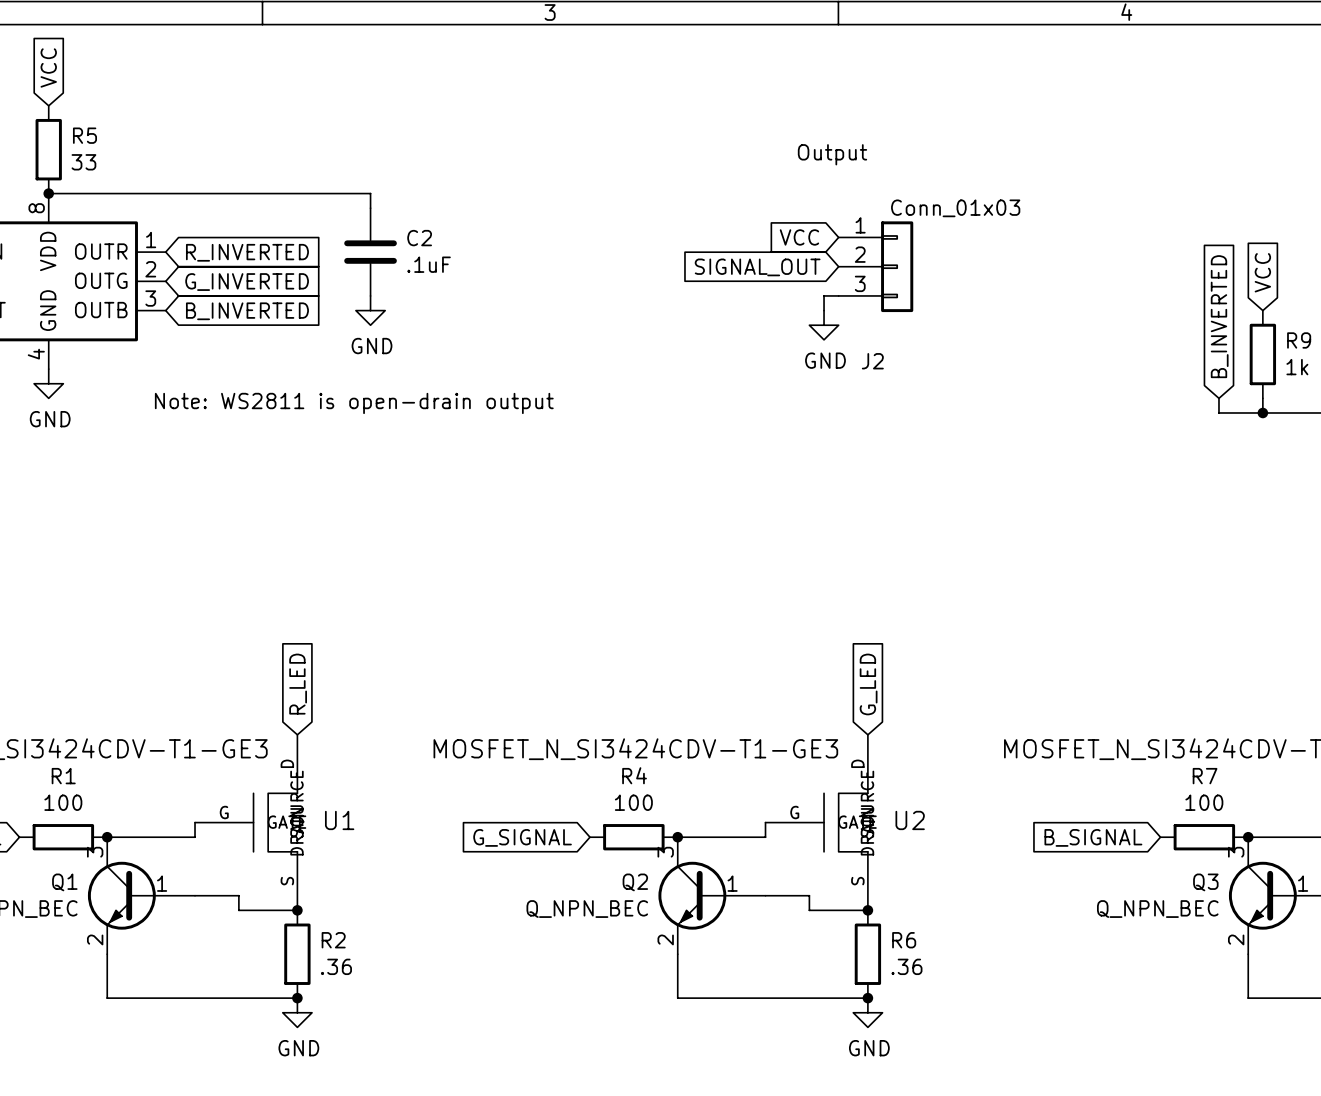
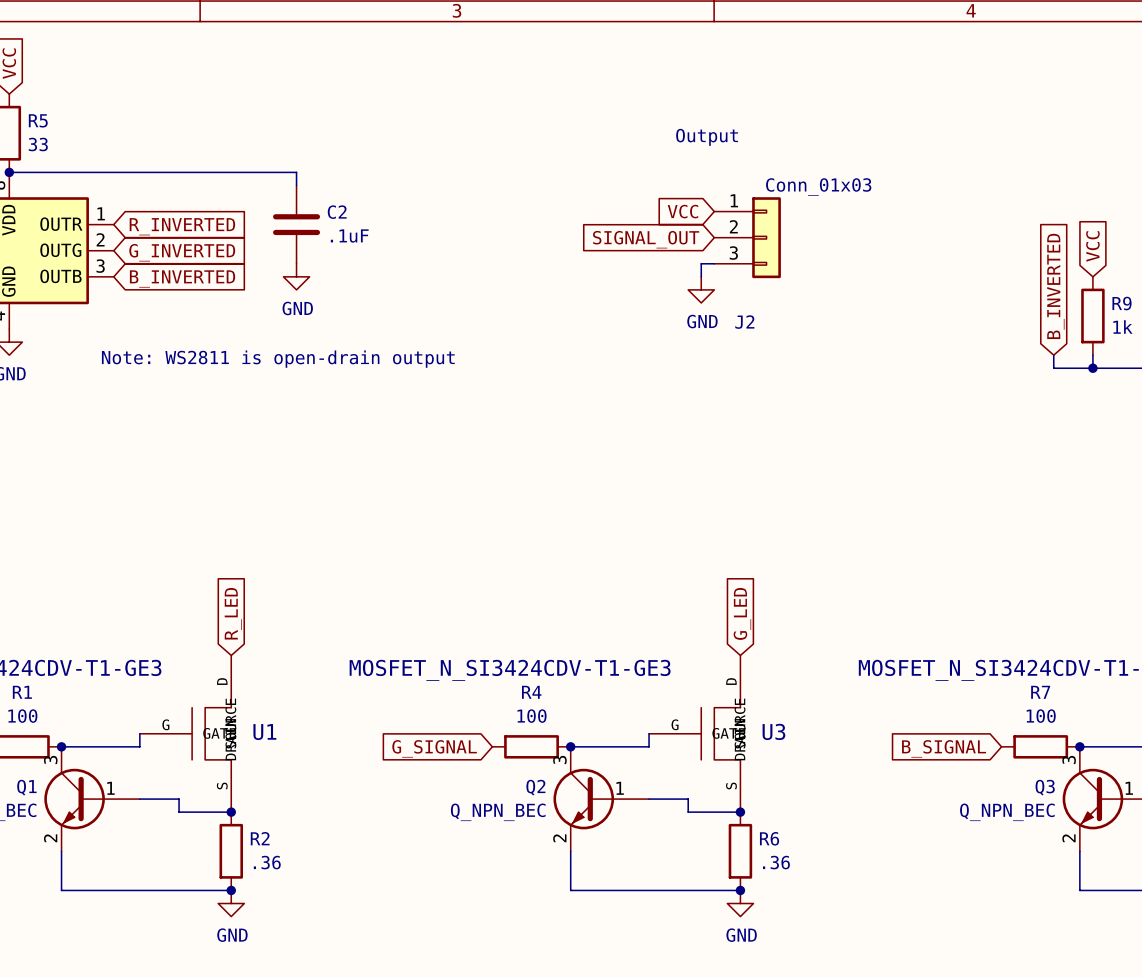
U2 name: U2 (910, 820) -> U3 (773, 731)

